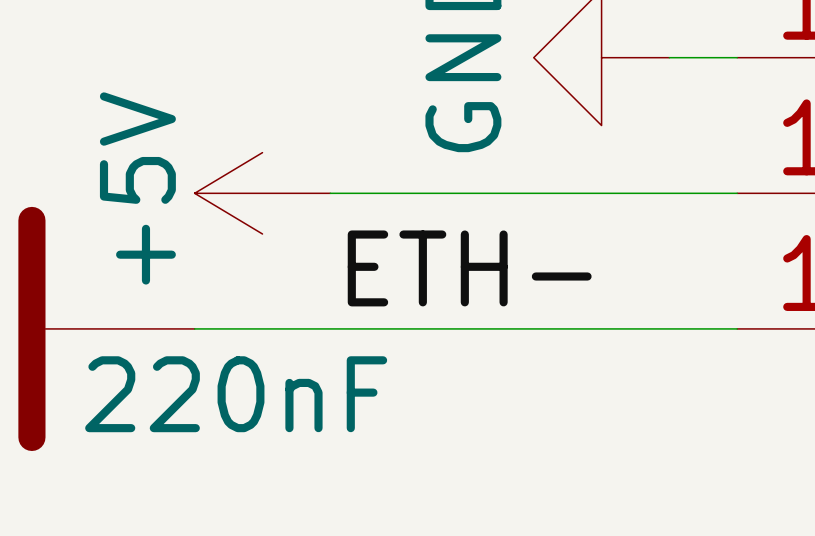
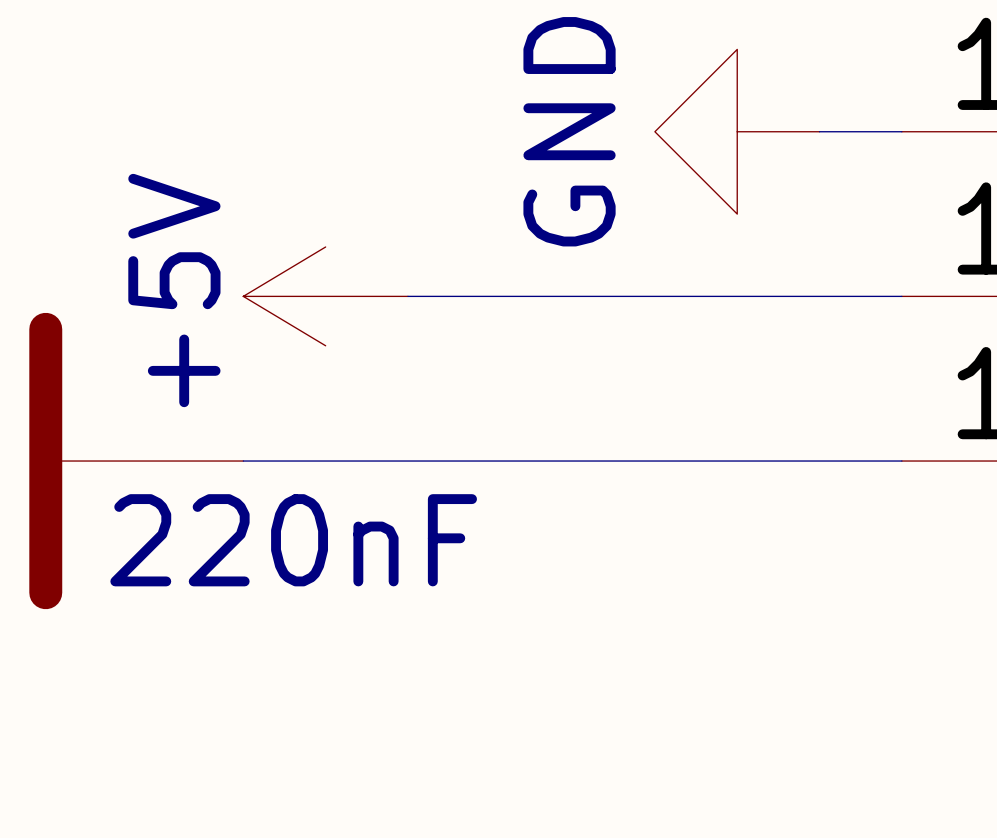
label: ETH- (469, 268) -> none

